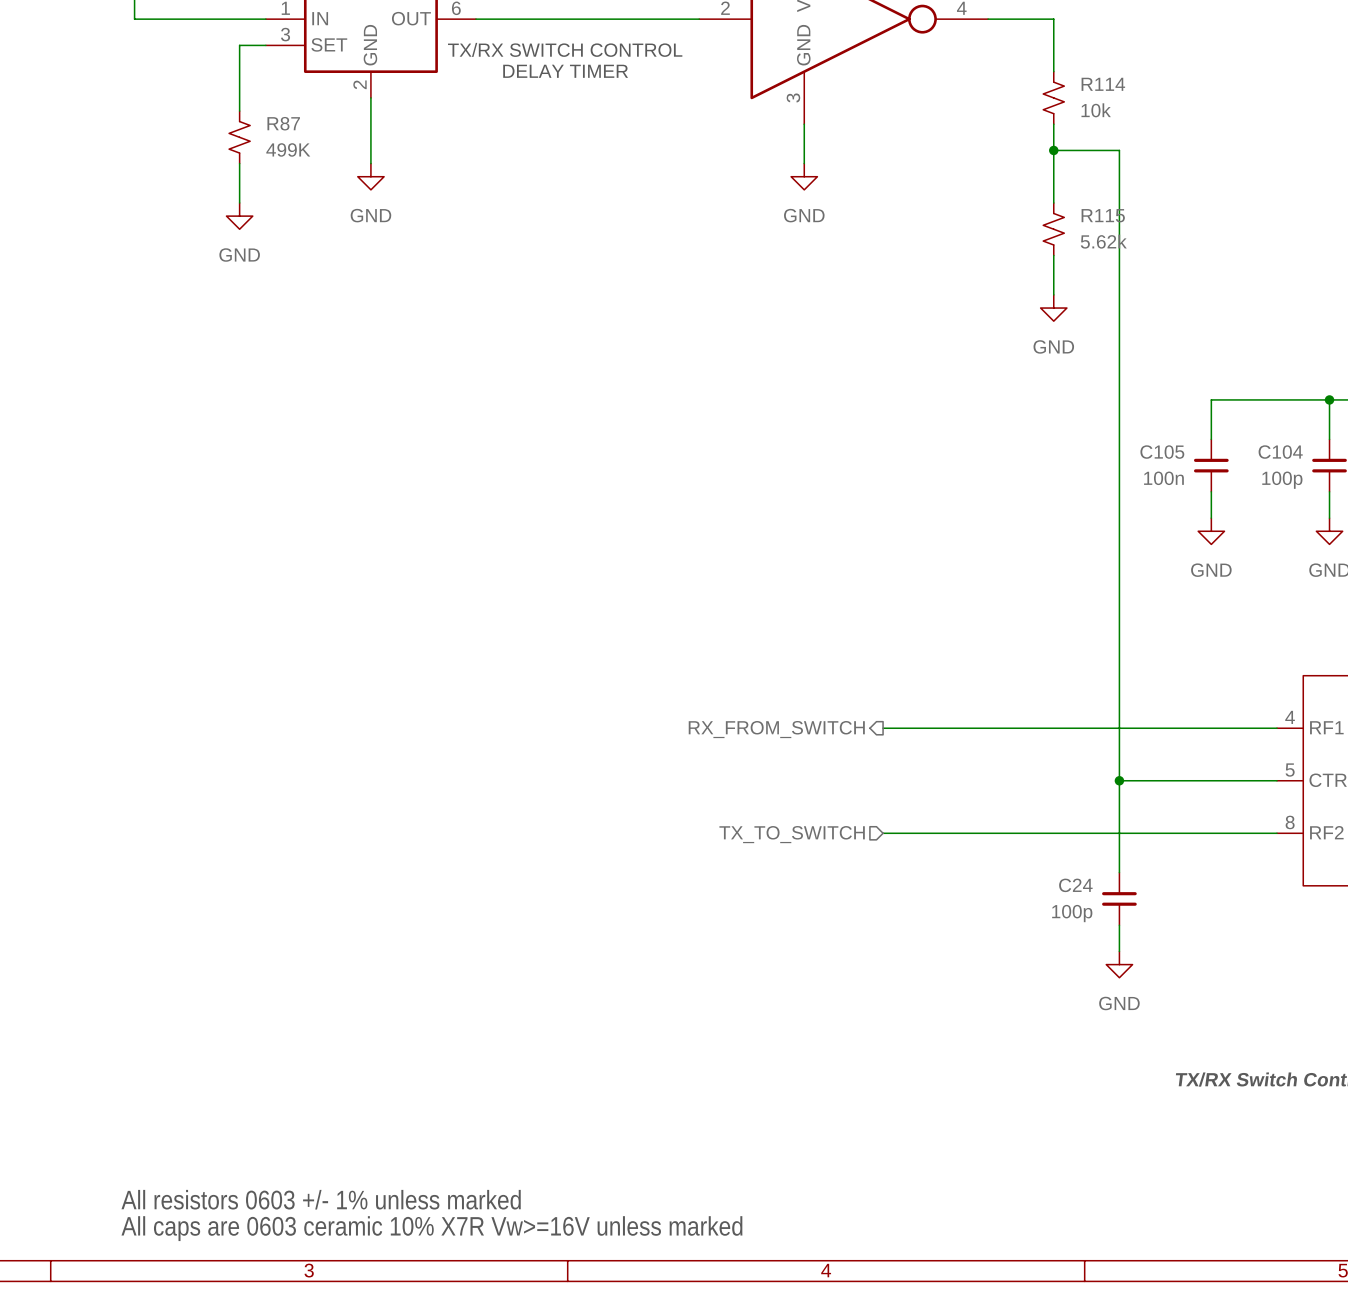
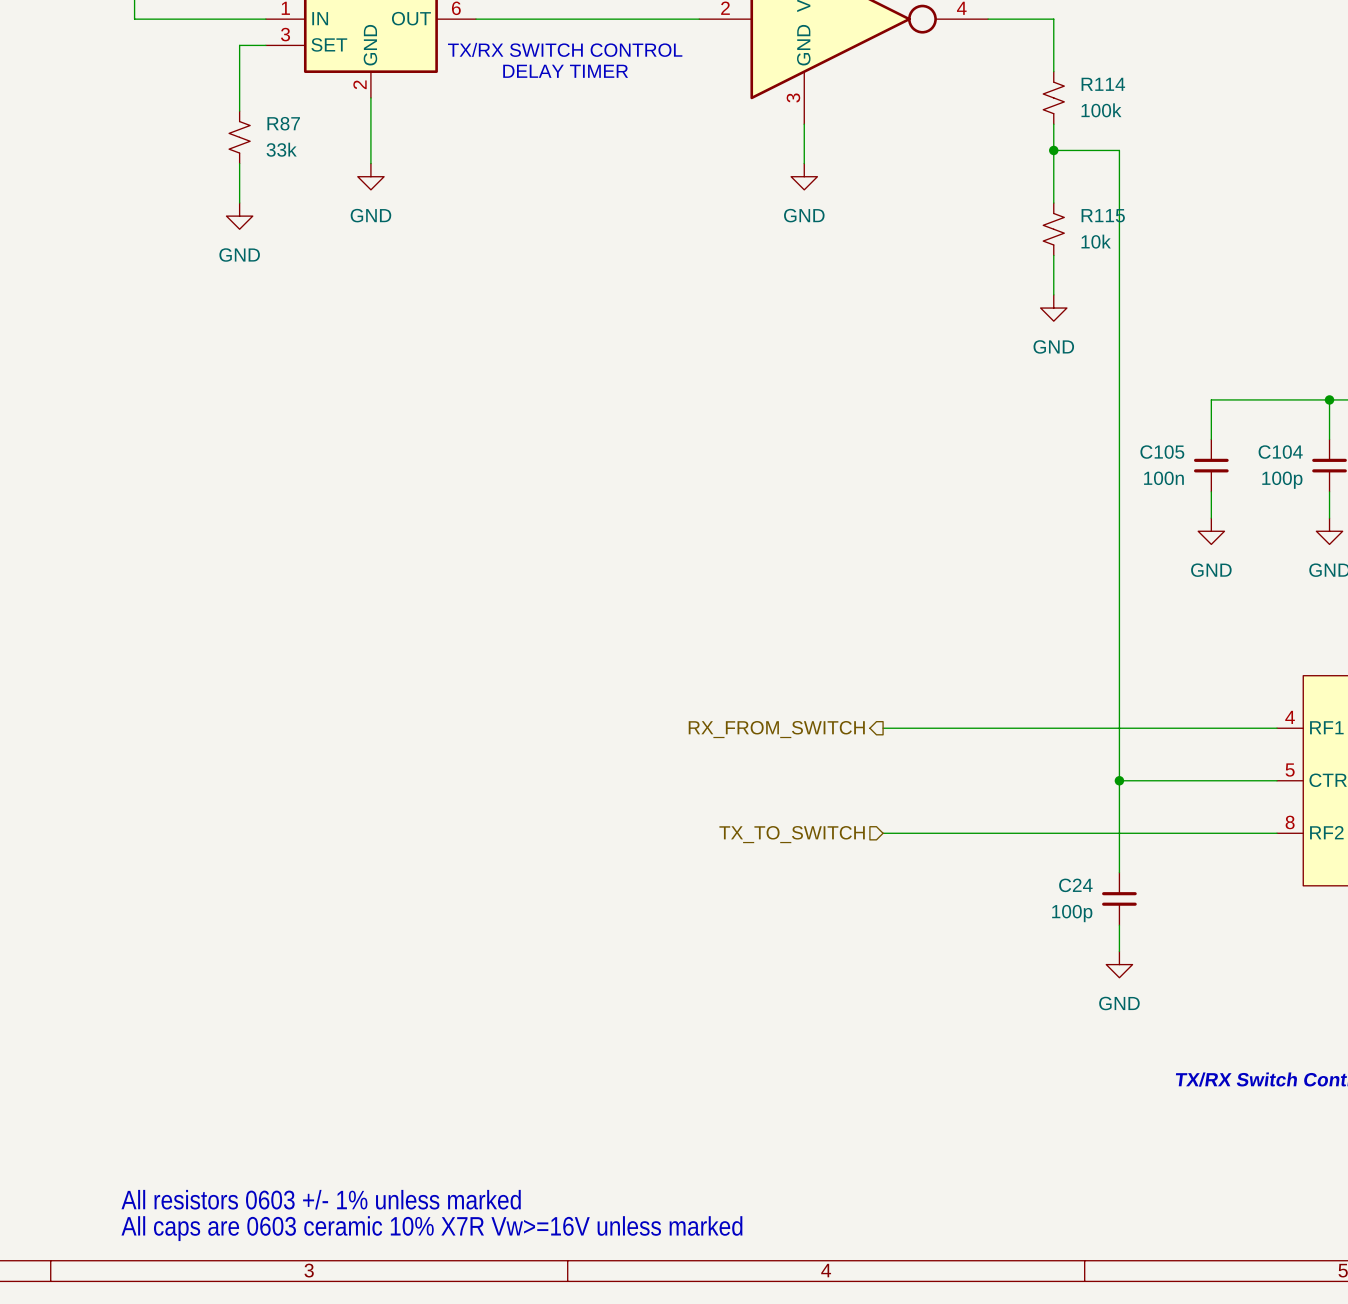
R114 value: 10k (1096, 110) -> 100k (1101, 110)
R87 value: 499K (288, 149) -> 33k (281, 149)
R115 value: 5.62k (1103, 241) -> 10k (1096, 241)

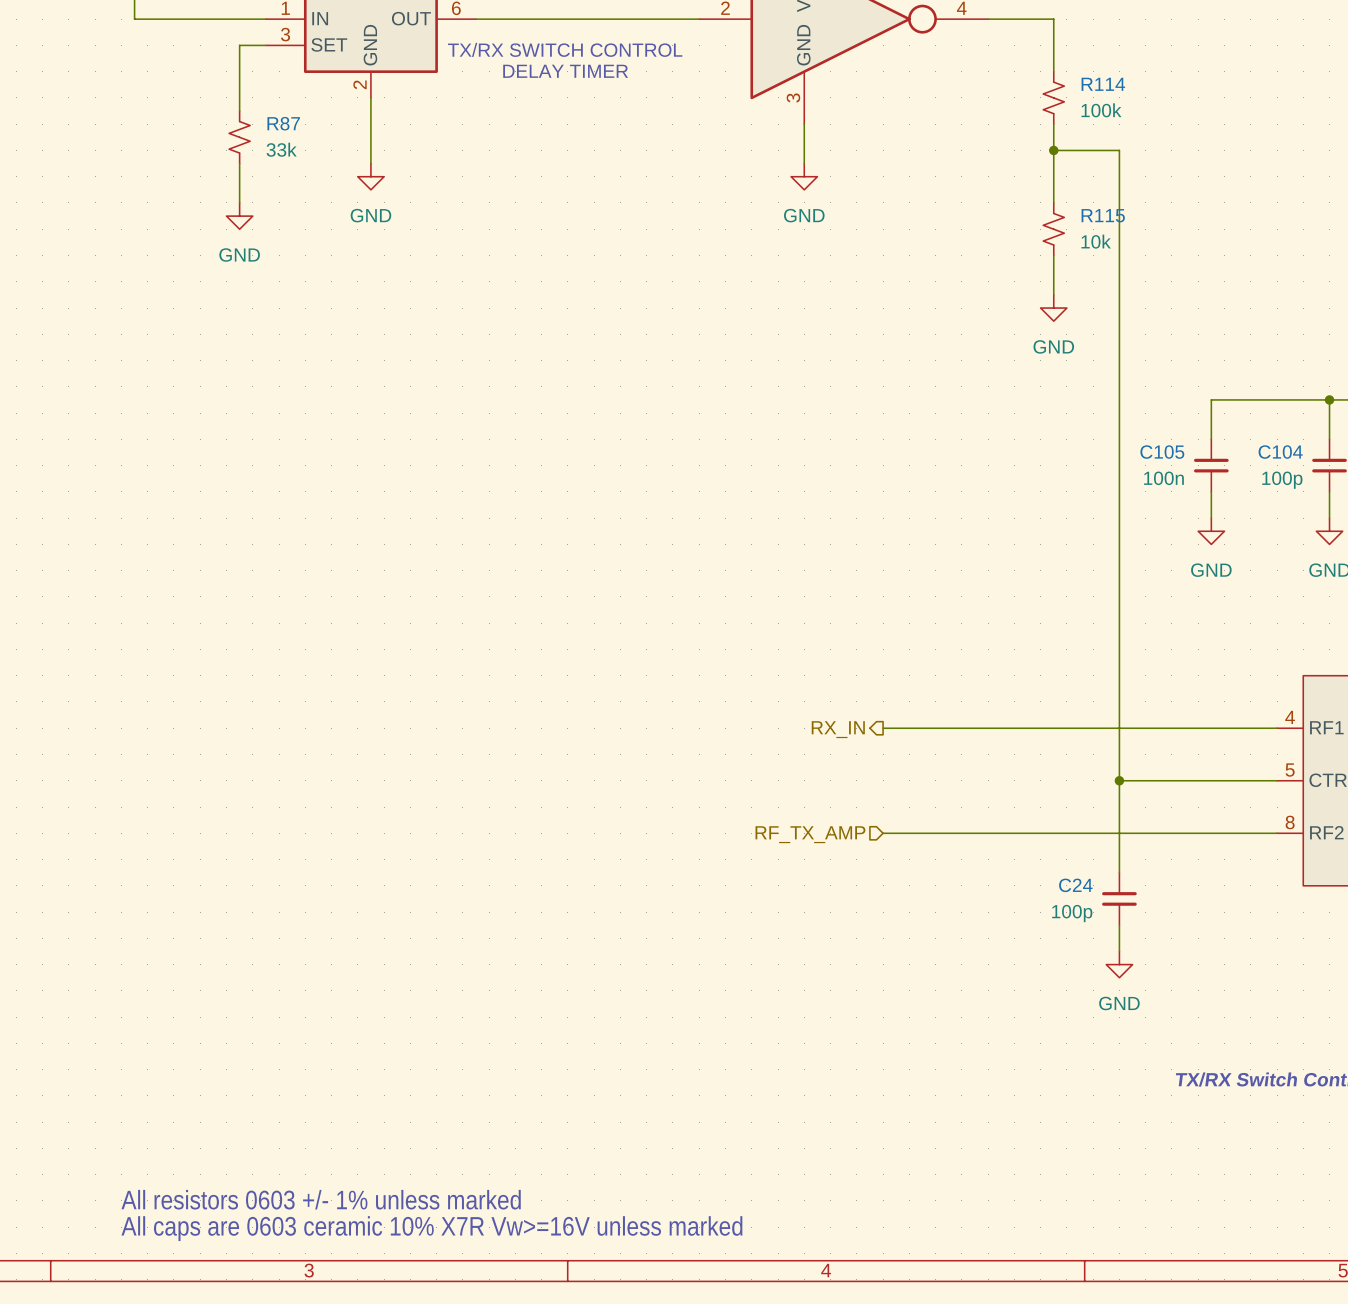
hierarchical label: RX_FROM_SWITCH (776, 729) -> RX_IN (838, 729)
hierarchical label: TX_TO_SWITCH (792, 834) -> RF_TX_AMP (810, 834)

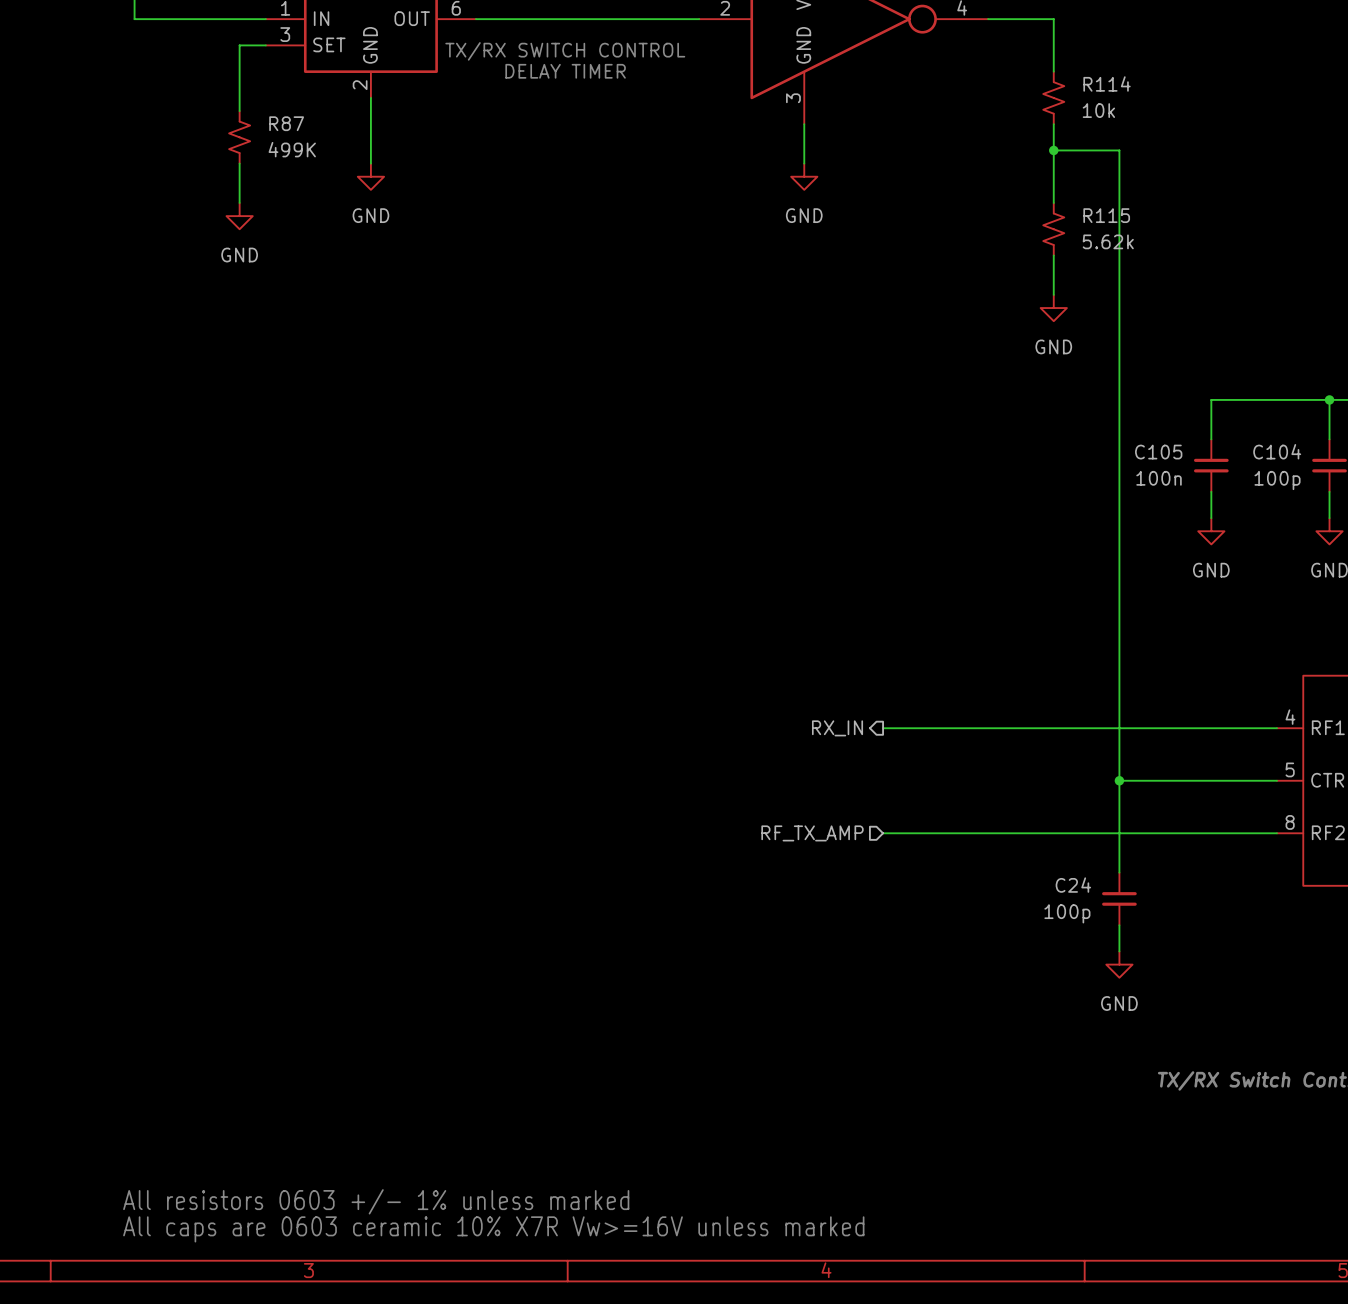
R114 value: 100k (1101, 110) -> 10k (1098, 110)
R87 value: 33k (281, 149) -> 499K (292, 149)
R115 value: 10k (1096, 241) -> 5.62k (1108, 241)

